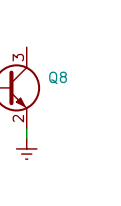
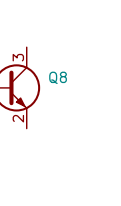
wire: (26, 128) (26, 138) -> none
power symbol: (26, 148) -> none

